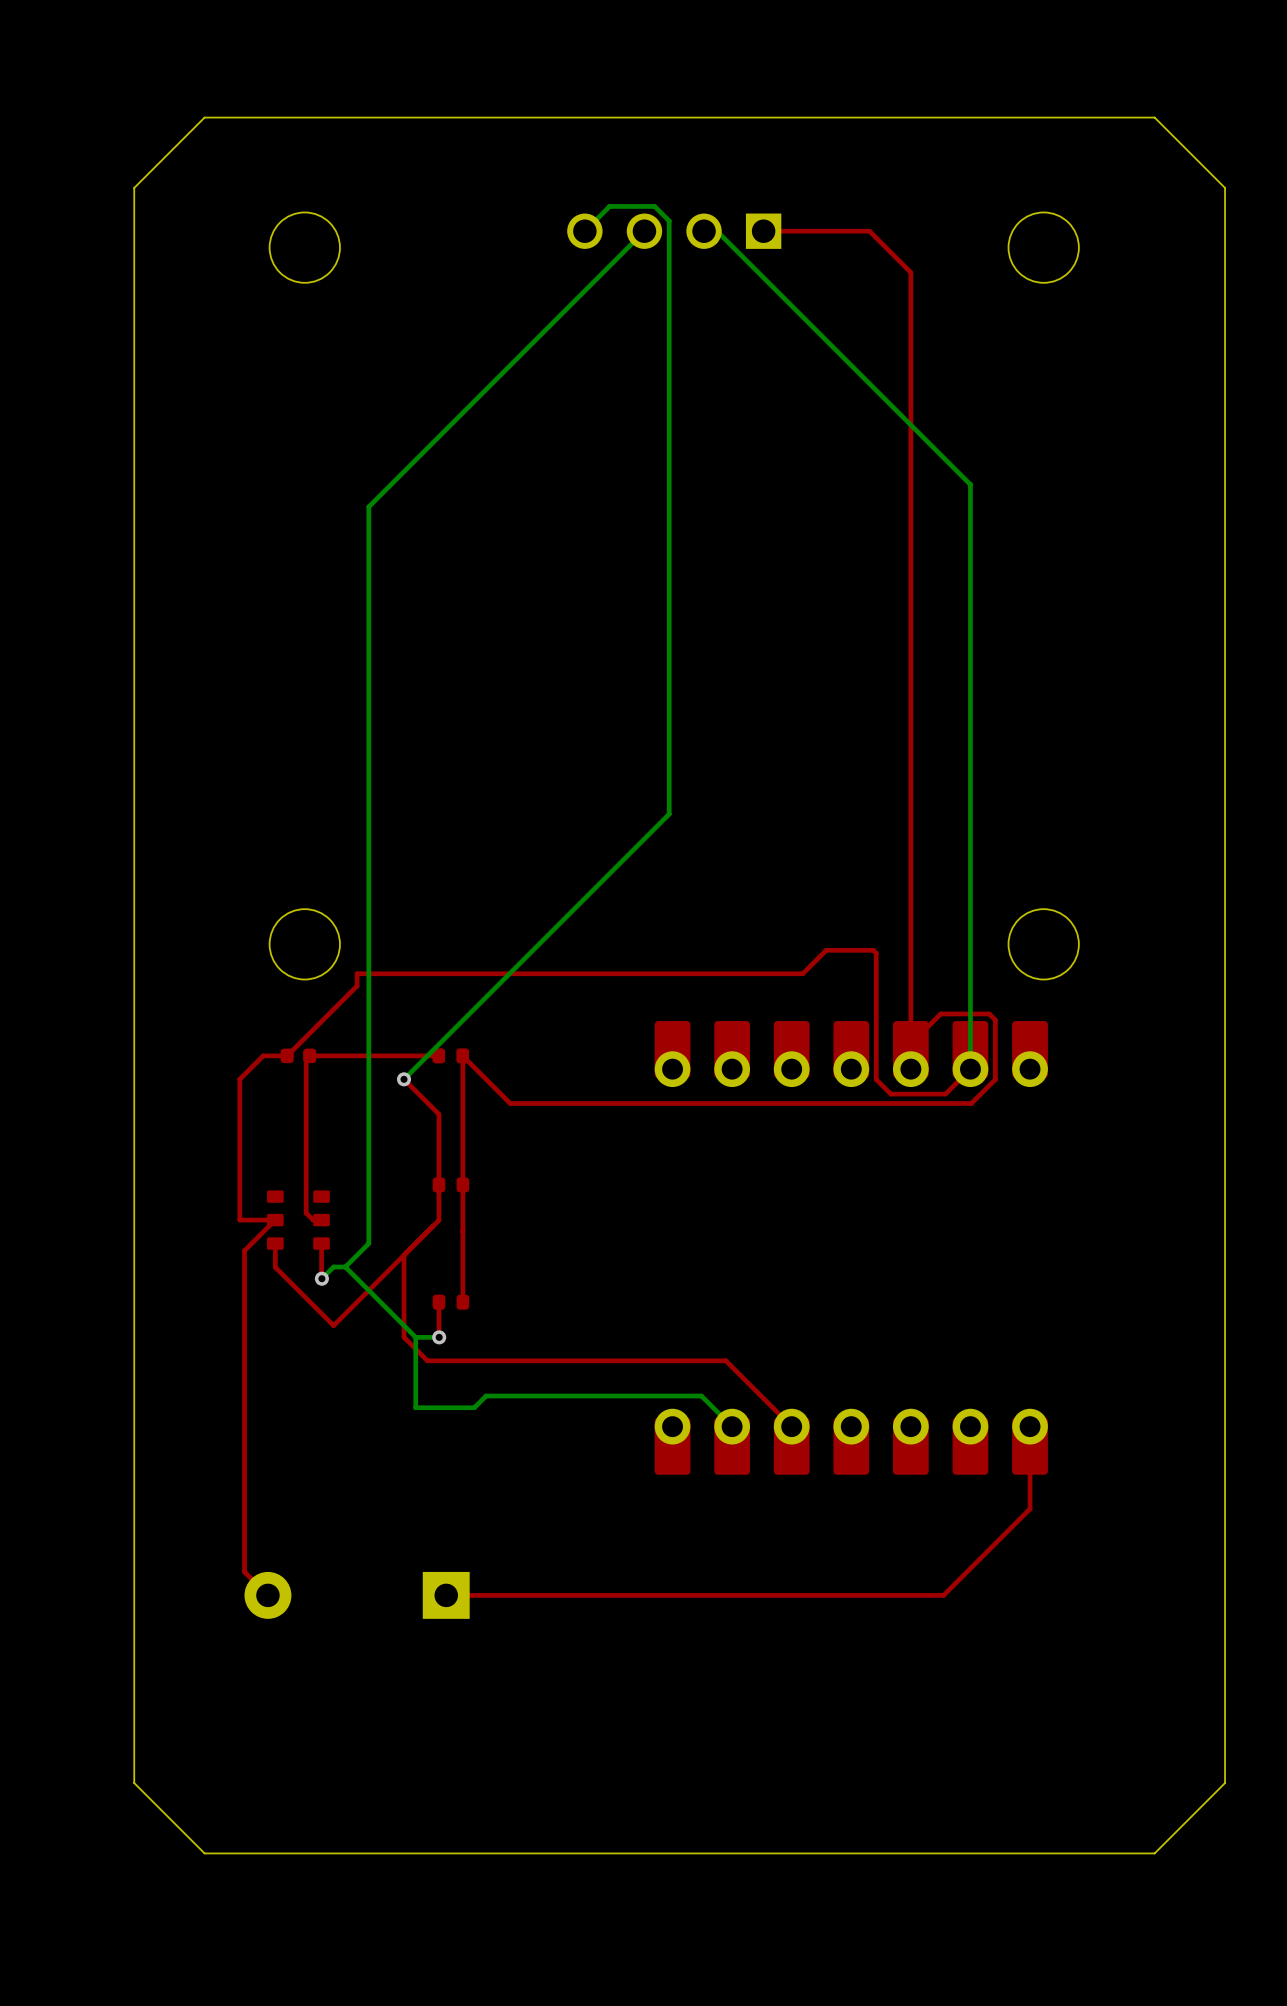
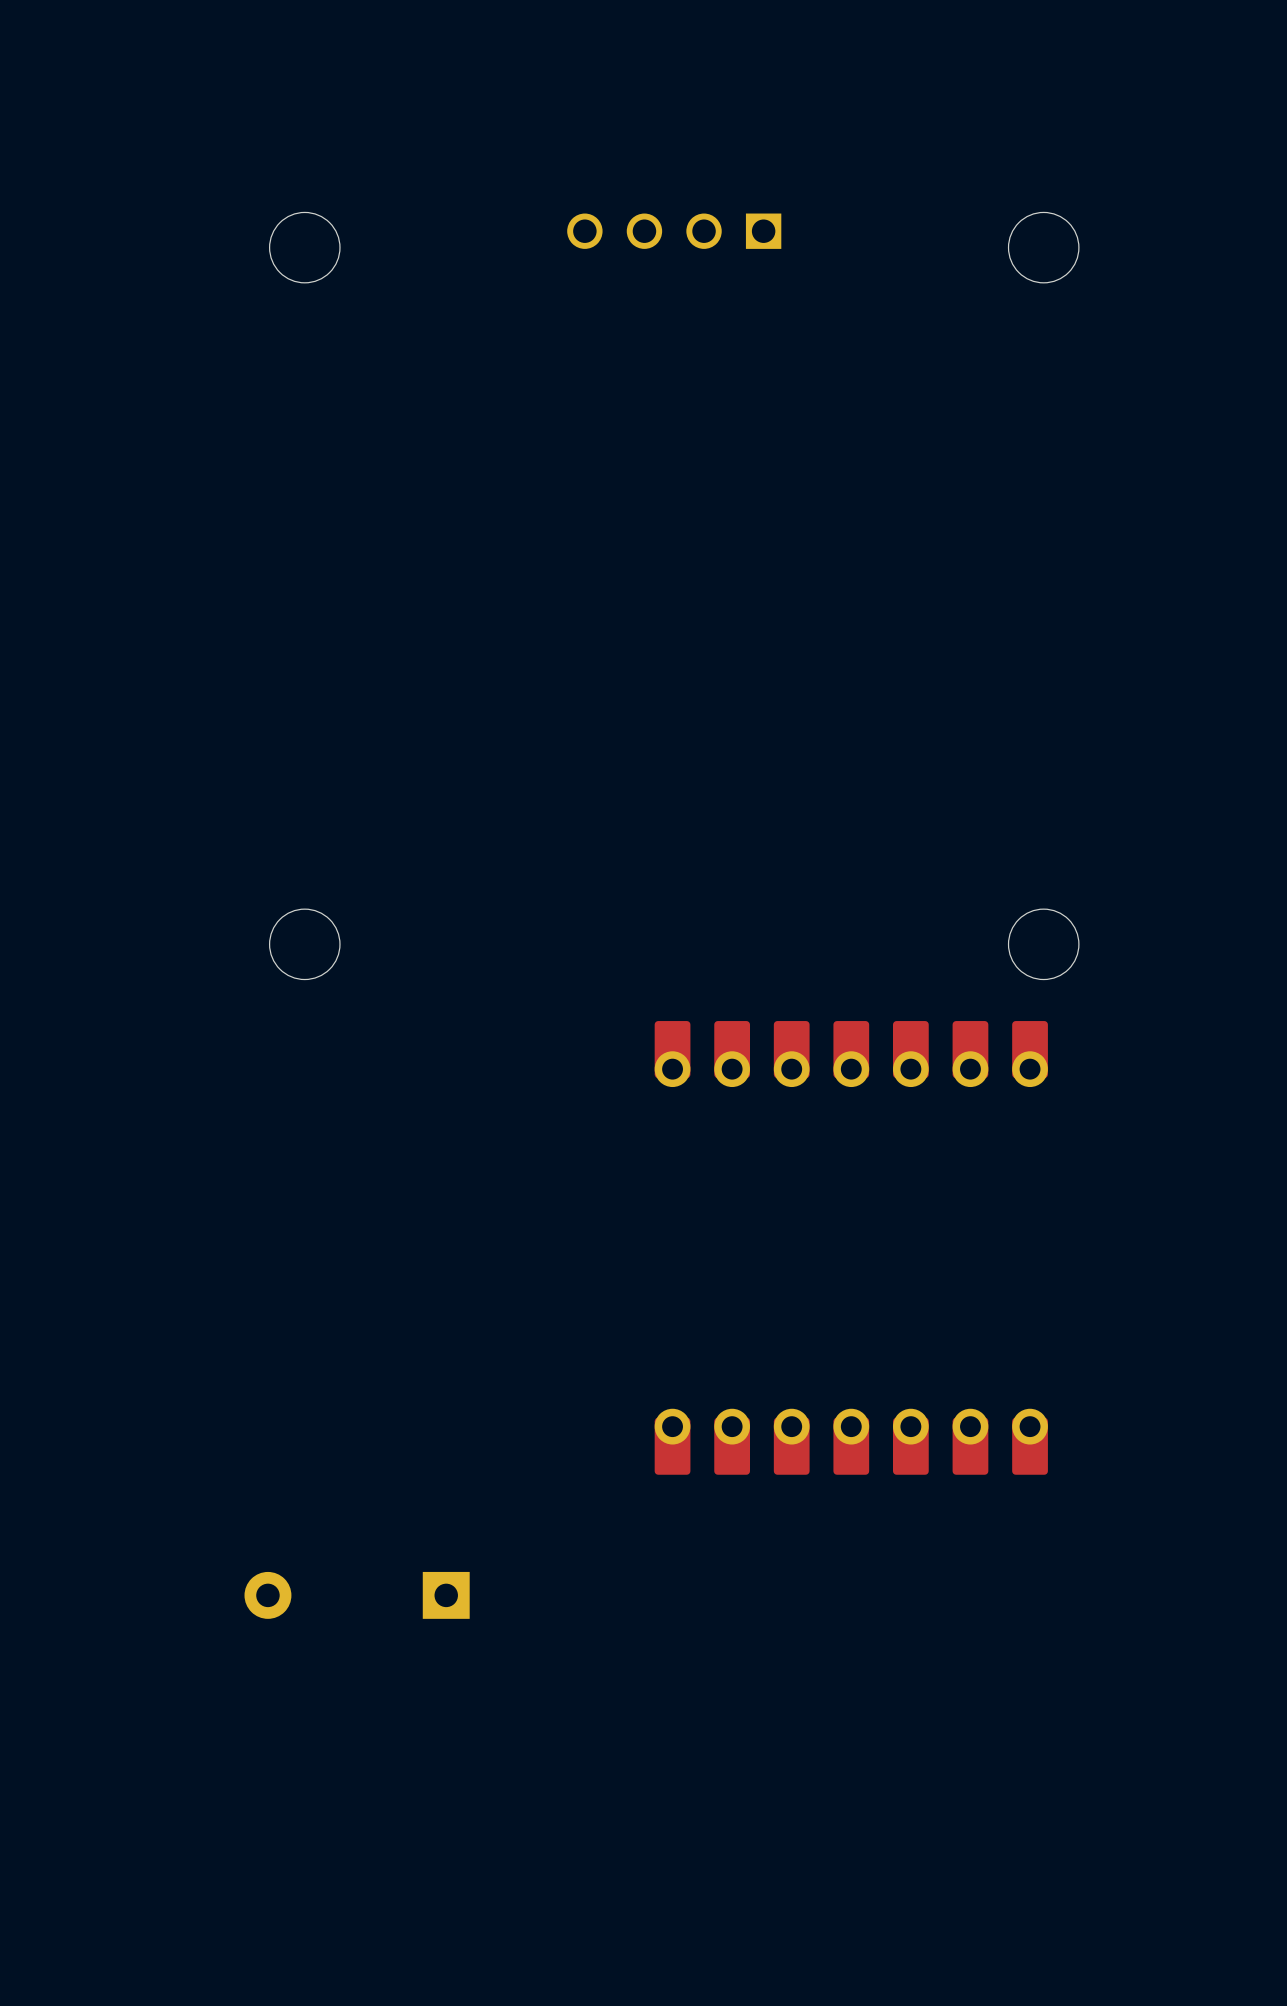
board edge: (1154, 117) (1225, 187) (1225, 1783) (1154, 1853) (204, 1853) (134, 1783) (134, 187) (204, 117) (1154, 117) -> none
bottom track: (584, 231) (609, 206) (654, 206) (669, 220) (669, 814) (404, 1079) -> none
bottom track: (644, 231) (368, 506) (368, 1243) (345, 1266) -> none
bottom track: (704, 231) (717, 231) (970, 484) (970, 1069) -> none
top track: (763, 231) (869, 231) (910, 272) (910, 1069) -> none
top track: (910, 1043) (940, 1013) (989, 1013) (995, 1020) (995, 1079) (971, 1103) (510, 1103) (462, 1055) -> none
part: (298, 1055) -> none
top track: (438, 1055) (309, 1055) (306, 1059) (306, 1213) (313, 1220) (321, 1220) -> none
part: (450, 1055) -> none
top track: (462, 1056) (462, 1231) -> none
top track: (970, 1069) (945, 1094) (890, 1094) (876, 1079) (876, 953) (873, 950) (826, 950) (802, 973) (357, 973) (357, 985) (287, 1055) (263, 1055) (239, 1079) (239, 1220) (275, 1220) (244, 1250) (244, 1571) (267, 1595) -> none
top track: (404, 1079) (438, 1114) (438, 1220) (333, 1325) (275, 1267) (275, 1243) -> none
via: (404, 1079) -> none
part: (450, 1184) -> none
part: (298, 1220) -> none
top track: (462, 1232) (462, 1302) -> none
top track: (321, 1243) (321, 1278) -> none
top track: (404, 1255) (404, 1337) (427, 1360) (725, 1360) (791, 1426) -> none
bottom track: (345, 1266) (415, 1337) -> none
bottom track: (345, 1266) (333, 1266) (321, 1278) -> none
via: (321, 1278) -> none
top track: (438, 1302) (438, 1337) -> none
part: (450, 1302) -> none
bottom track: (415, 1337) (415, 1407) (474, 1407) (486, 1396) (701, 1396) (732, 1426) -> none
bottom track: (439, 1337) (415, 1337) -> none
via: (439, 1337) -> none
top track: (1030, 1426) (1030, 1508) (943, 1595) (446, 1595) -> none

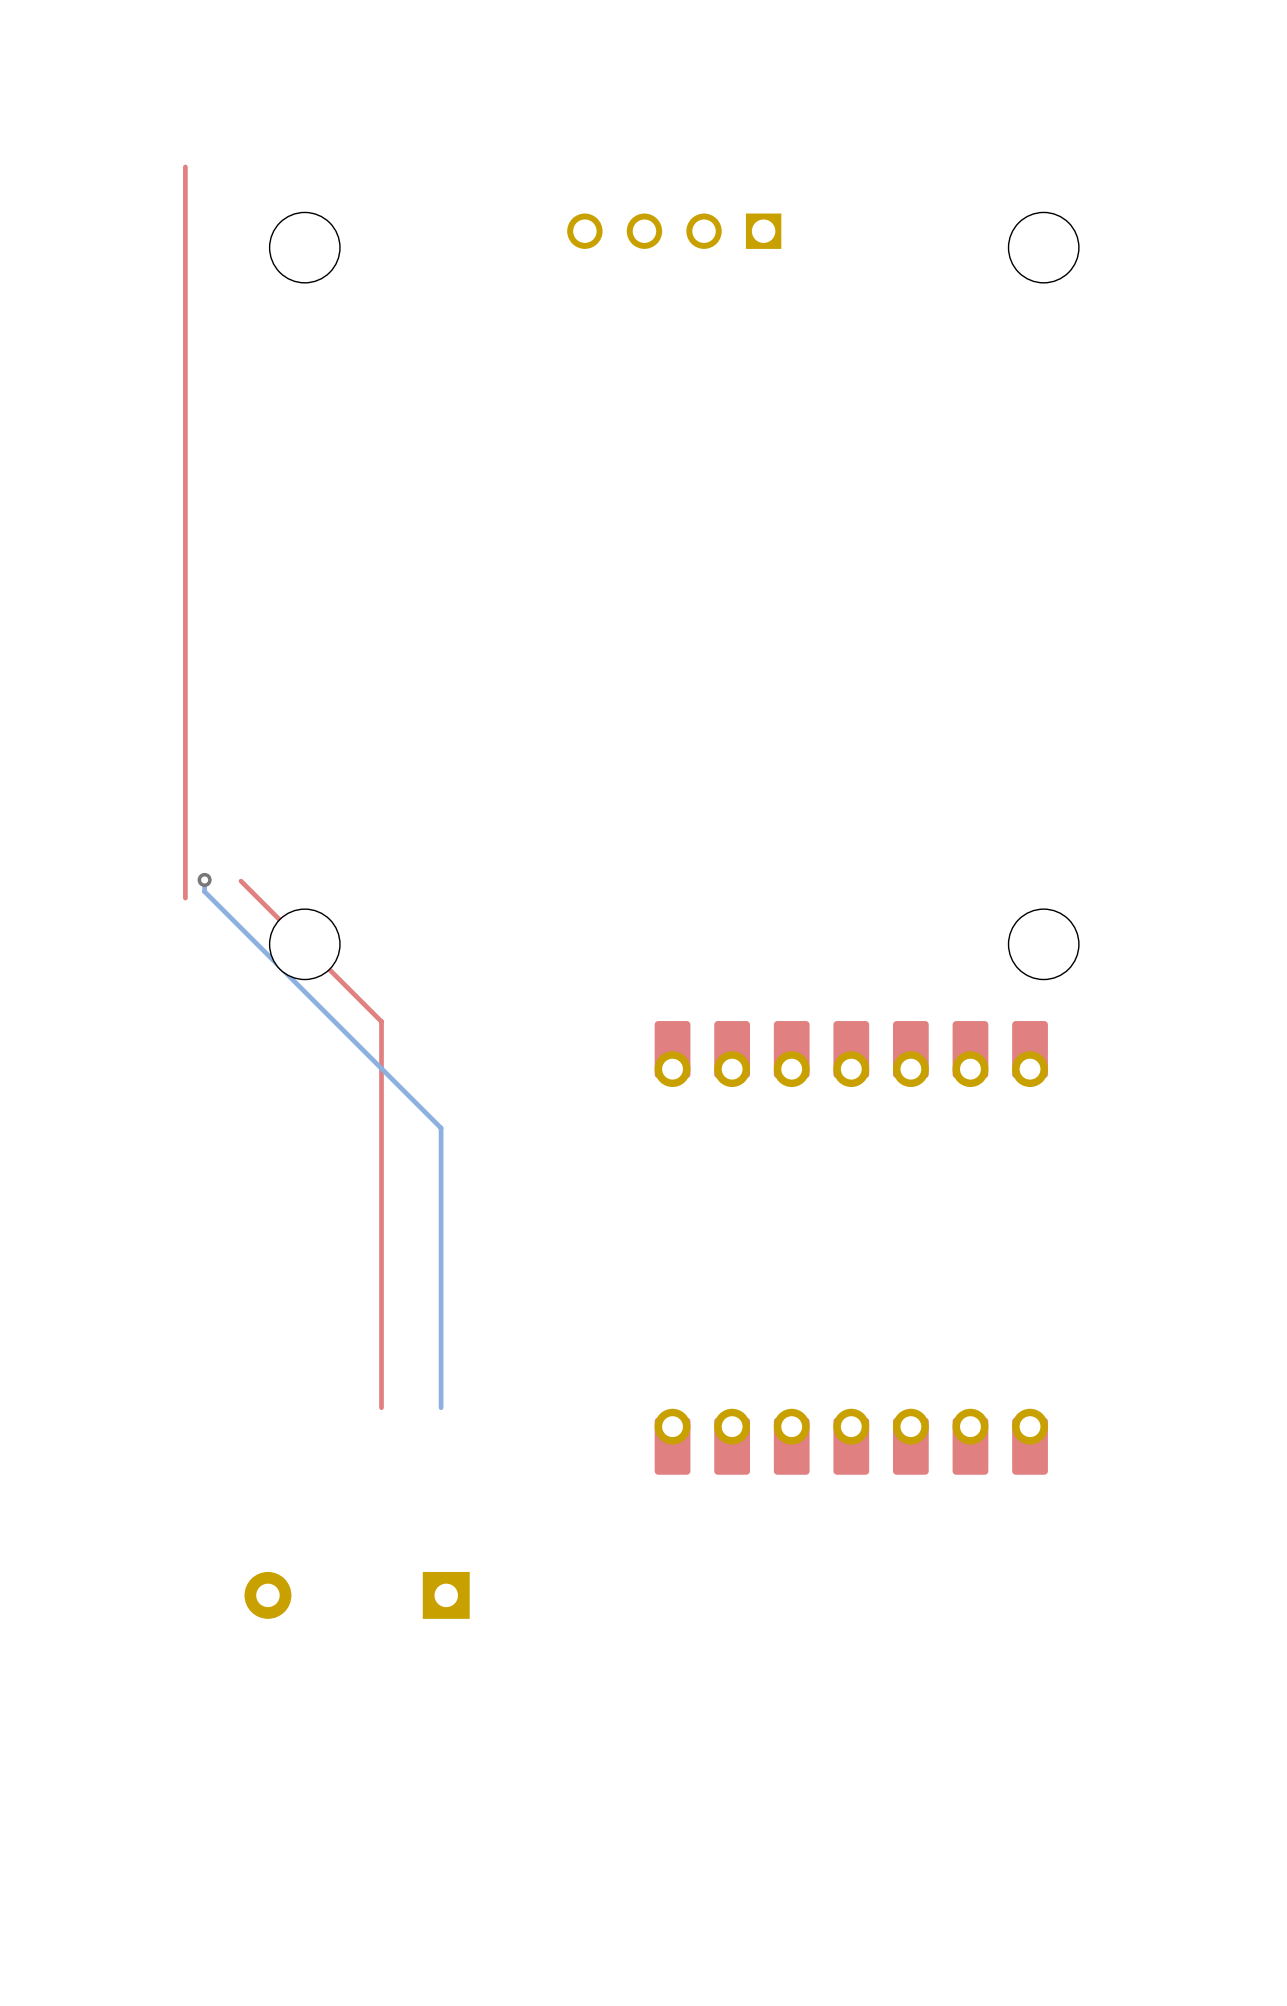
top track: none -> (185, 166) (185, 898)
bottom track: none -> (204, 879) (204, 891) (441, 1128) (441, 1407)
via: none -> (204, 879)
top track: none -> (240, 881) (381, 1021) (381, 1407)

